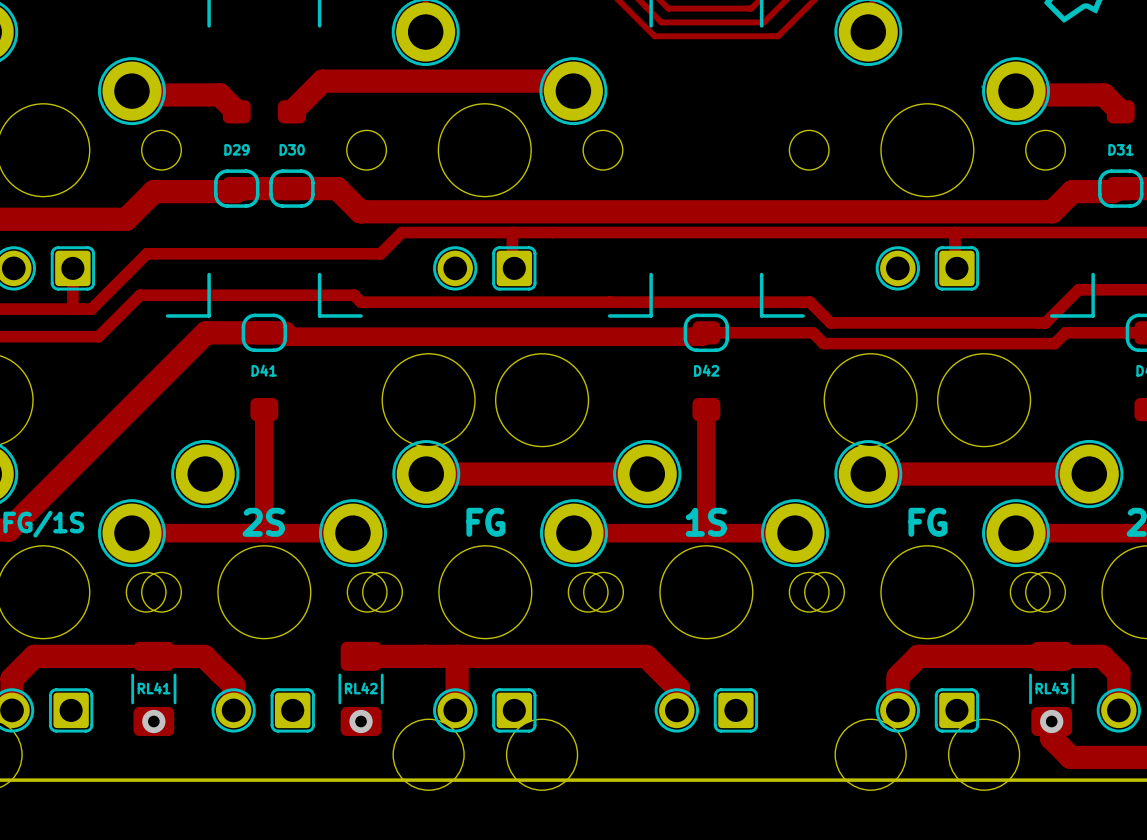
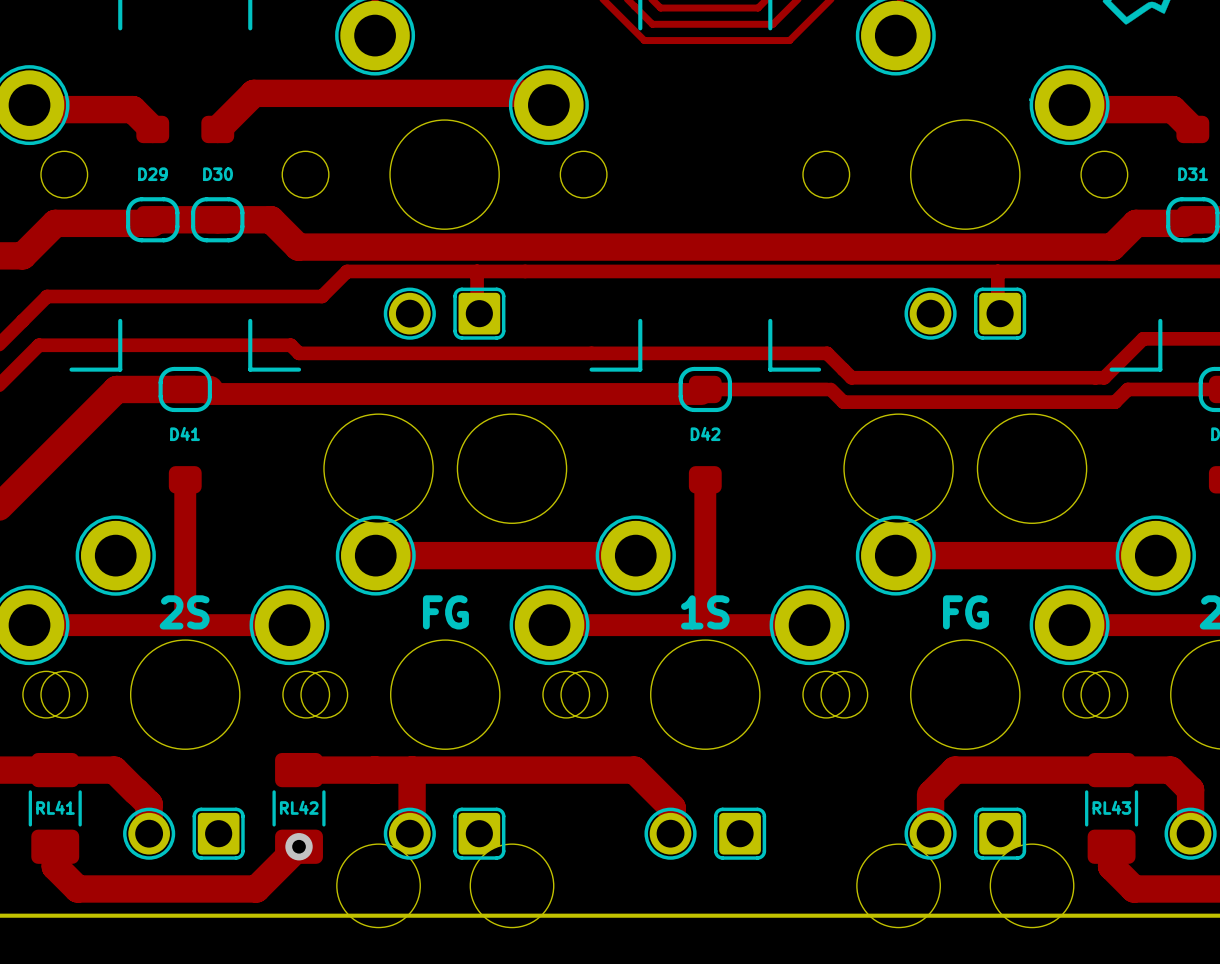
track: none -> (55, 846) (55, 866) (77, 888) (256, 888) (297, 847)
via: (153, 721) -> none
via: (1051, 721) -> none

